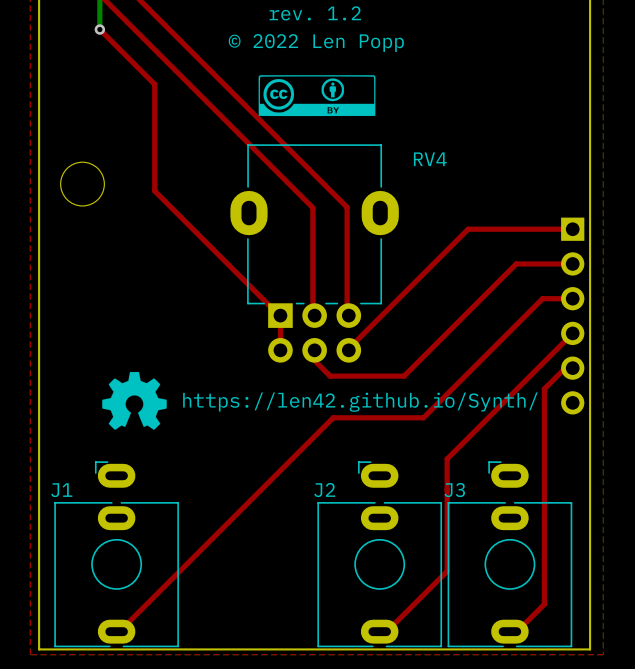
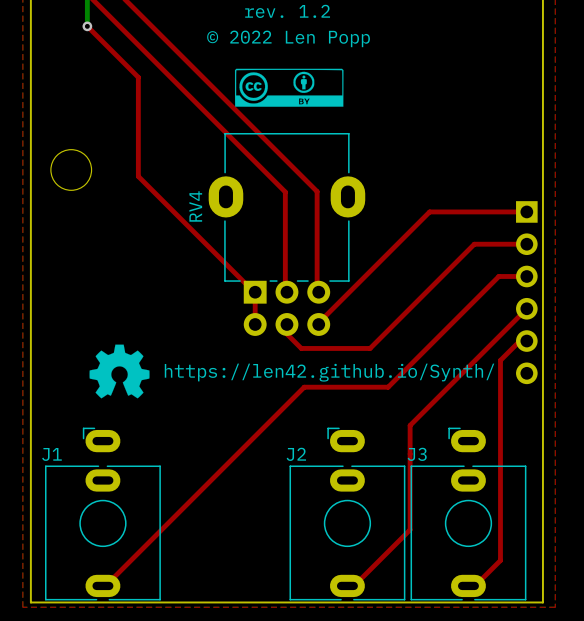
RV4 name rotation: 0° (430, 159) -> 90° counterclockwise (195, 206)
RV4 name position: RV4 (430, 159) -> RV4 (195, 206)

